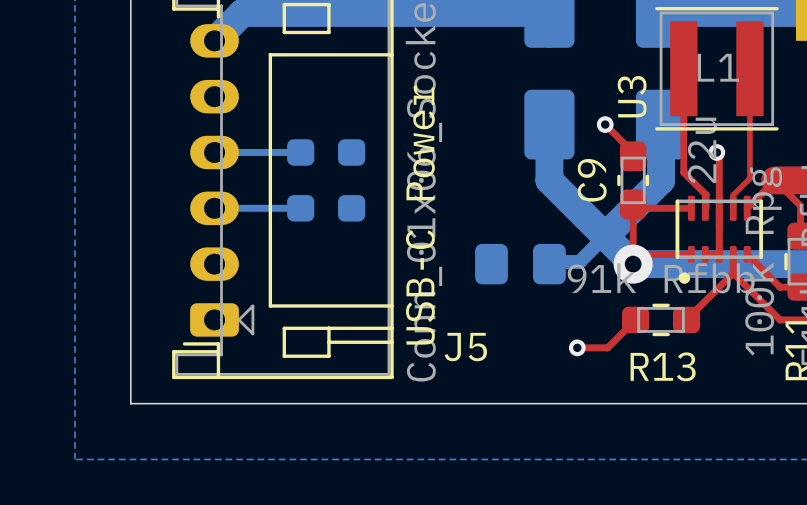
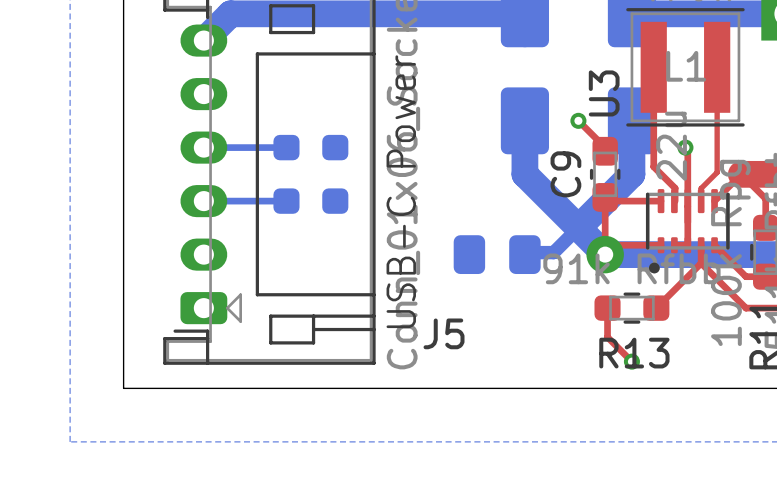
top track: (635, 319) (607, 347) (577, 347) -> (607, 308) (607, 337) (631, 361)
via position: (577, 347) -> (631, 361)

